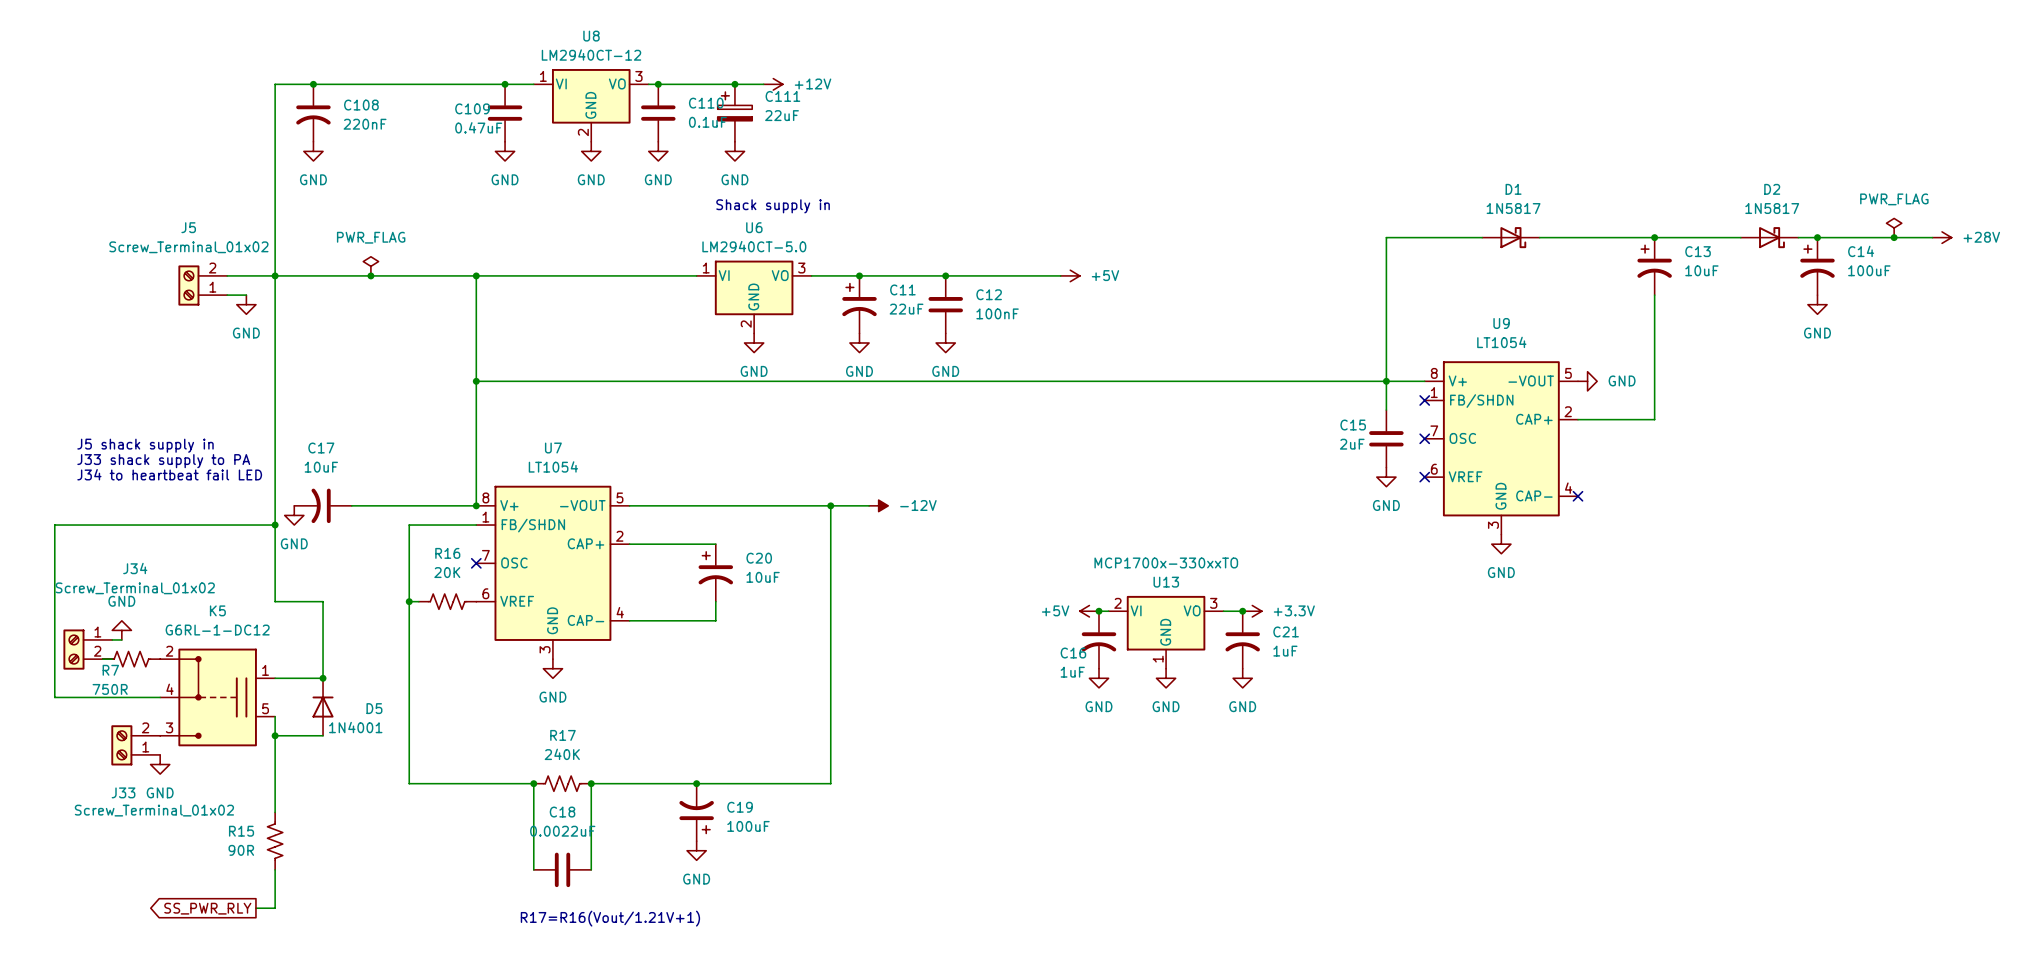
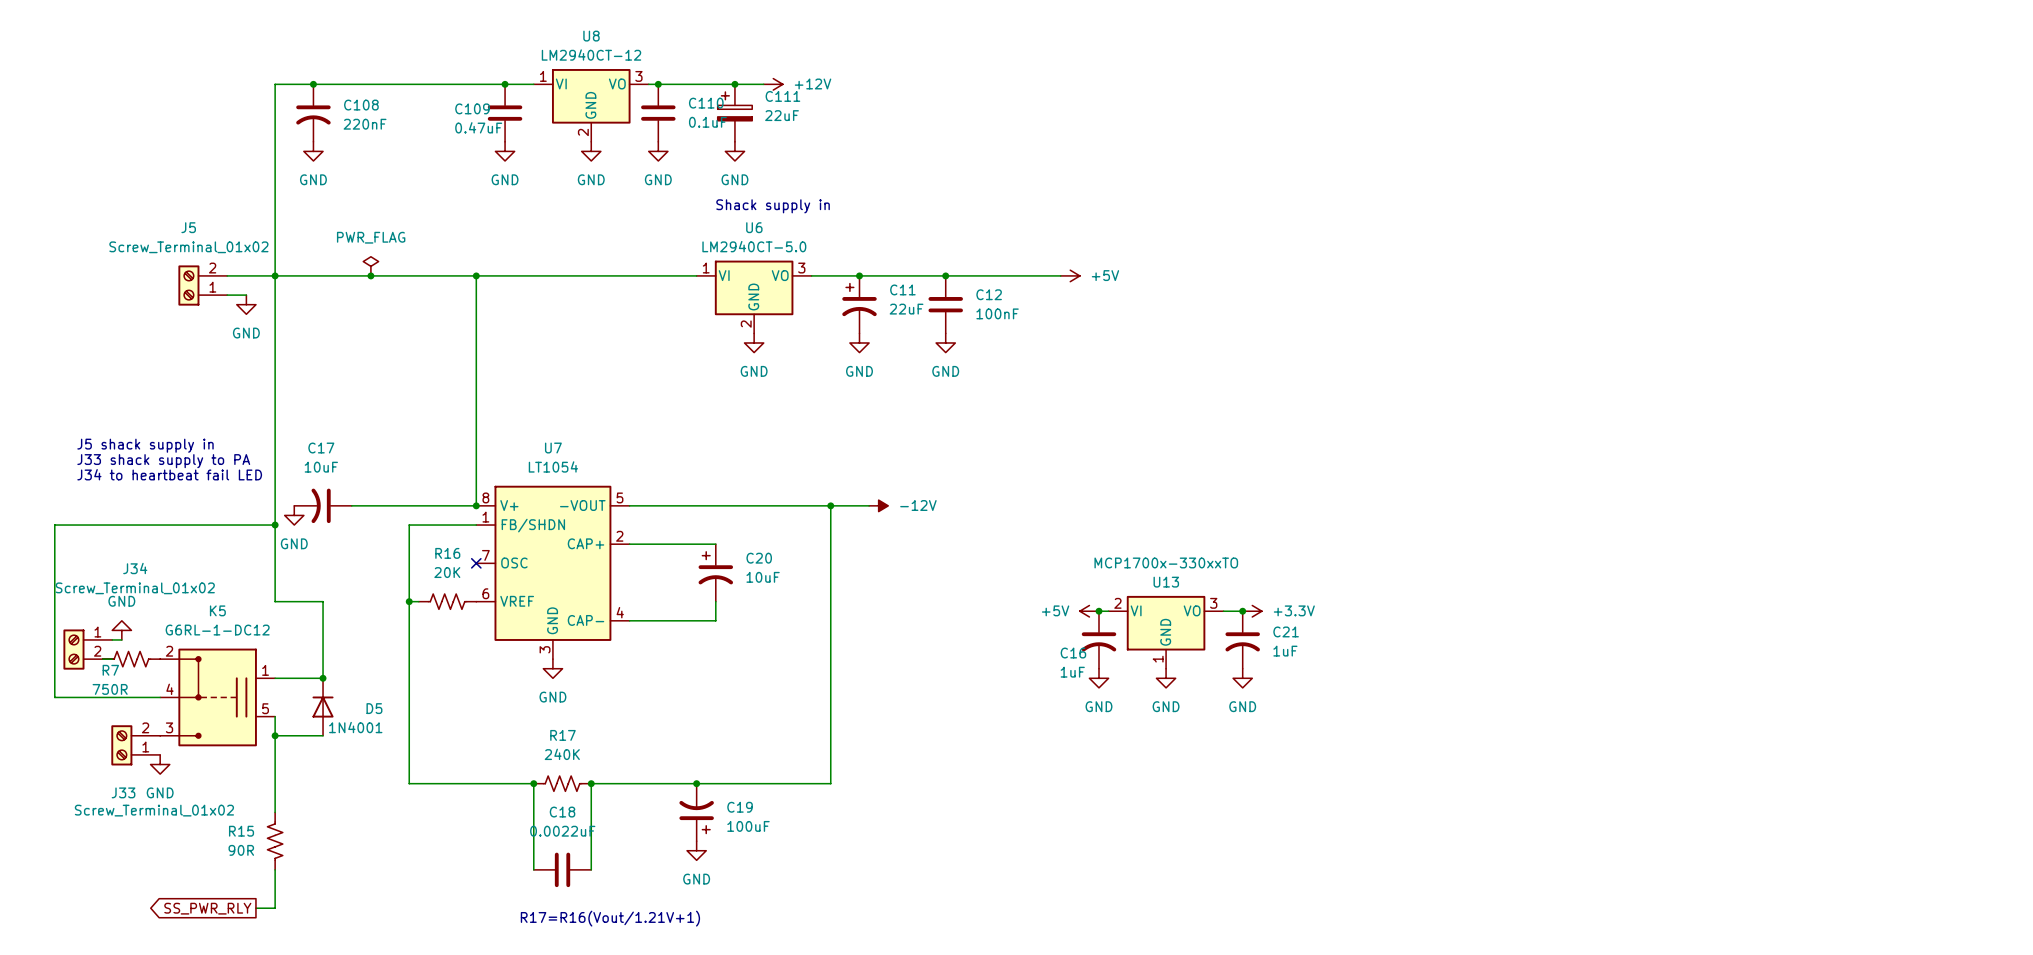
power symbol: PWR_FLAG (1894, 228) -> none
wire: (1482, 237) (1386, 237) (1386, 410) -> none
D1: 1N5817 (1510, 237) -> none
wire: (1539, 237) (1740, 237) -> none
junction: (1654, 237) -> none
D2: 1N5817 (1769, 237) -> none
wire: (1798, 237) (1932, 237) -> none
junction: (1817, 237) -> none
junction: (1894, 237) -> none
power symbol: +28V (1942, 237) -> none
C13: 10uF (1654, 266) -> none
C14: 100uF (1817, 266) -> none
wire: (1654, 295) (1654, 419) (1577, 419) -> none
power symbol: GND (1817, 304) -> none
wire: (476, 381) (1424, 381) -> none
junction: (476, 381) -> none
junction: (1386, 381) -> none
power symbol: GND (1587, 381) -> none
no-connect mark: (1424, 400) -> none
C15: 2uF (1386, 438) -> none
no-connect mark: (1424, 438) -> none
U9: LT1054 (1501, 447) -> none
power symbol: GND (1386, 477) -> none
no-connect mark: (1424, 477) -> none
no-connect mark: (1577, 496) -> none
power symbol: GND (1501, 544) -> none

